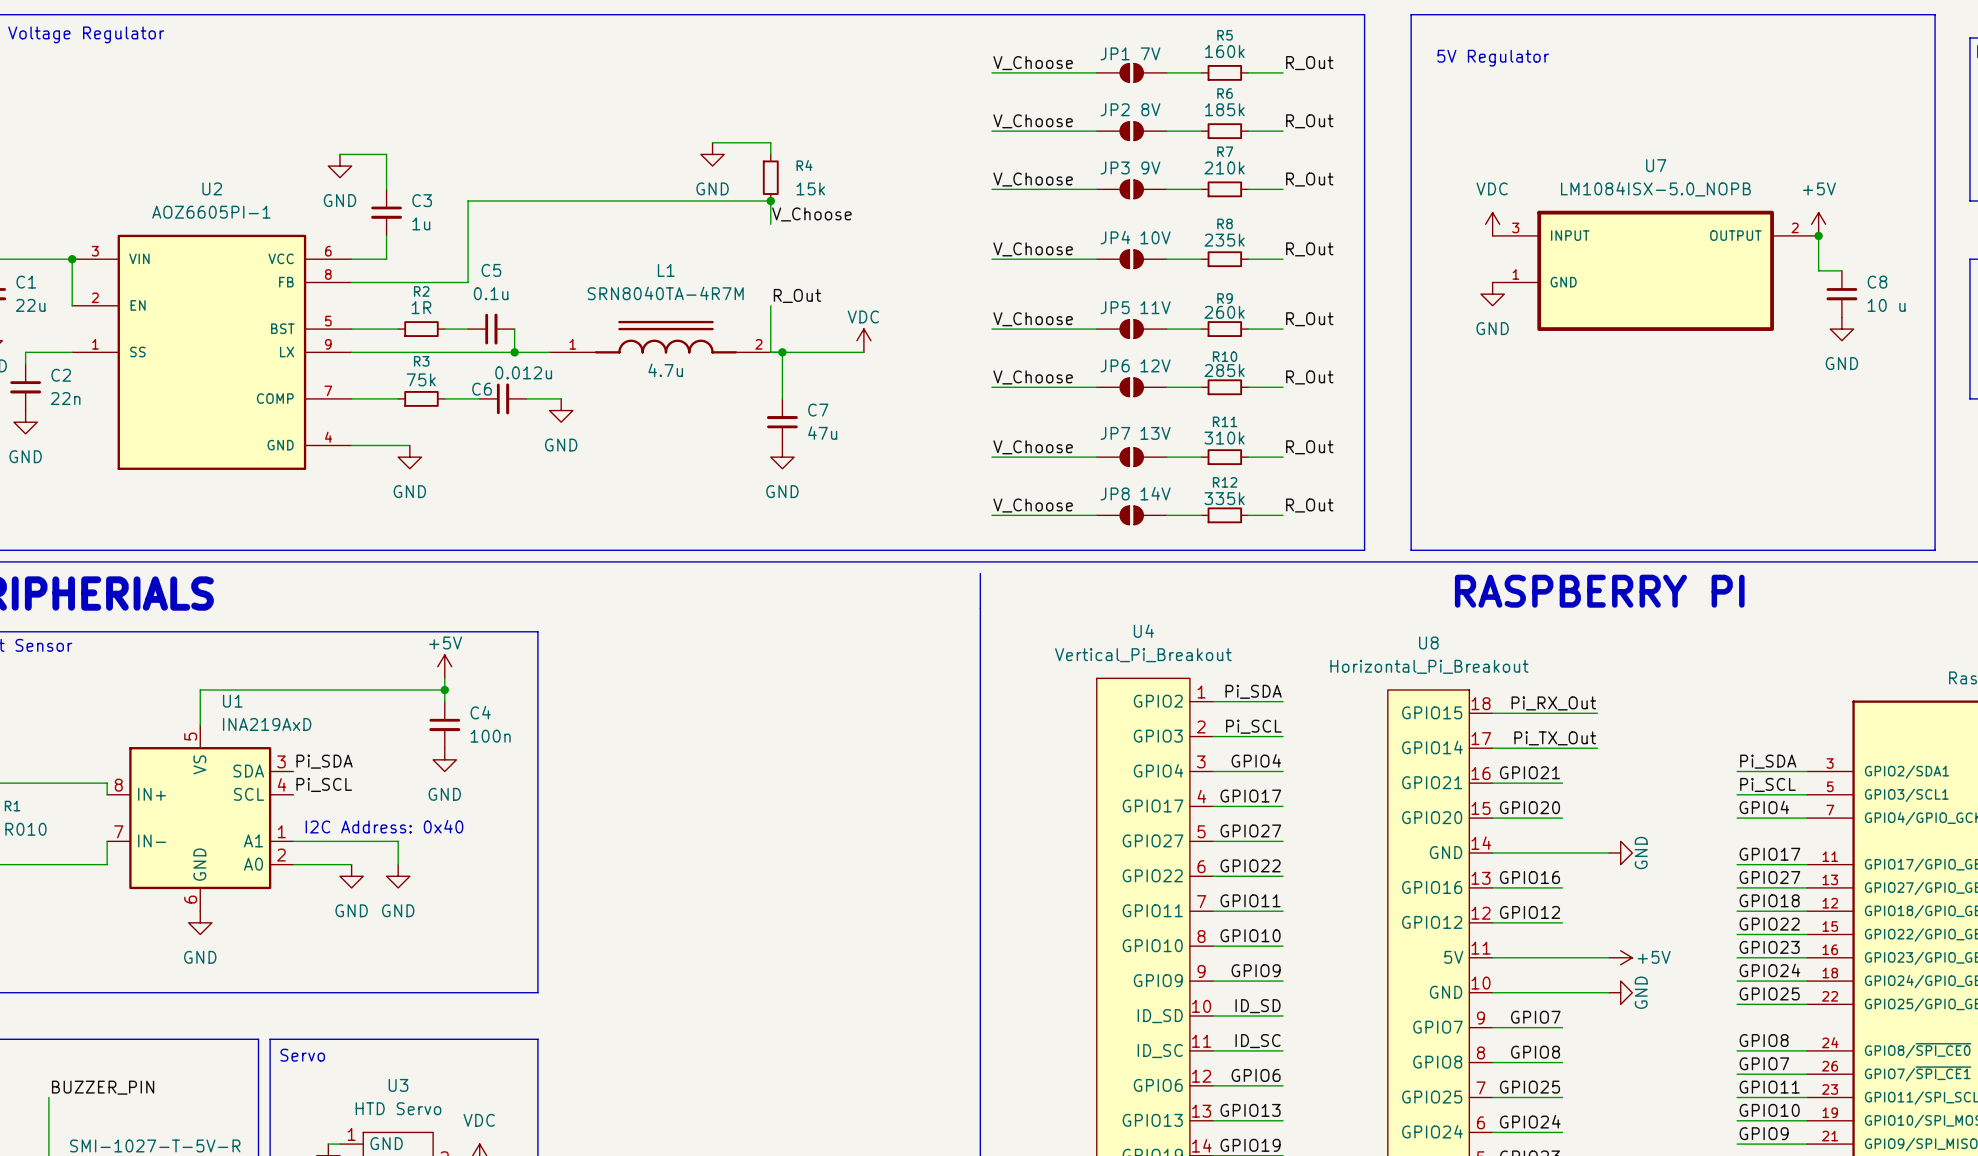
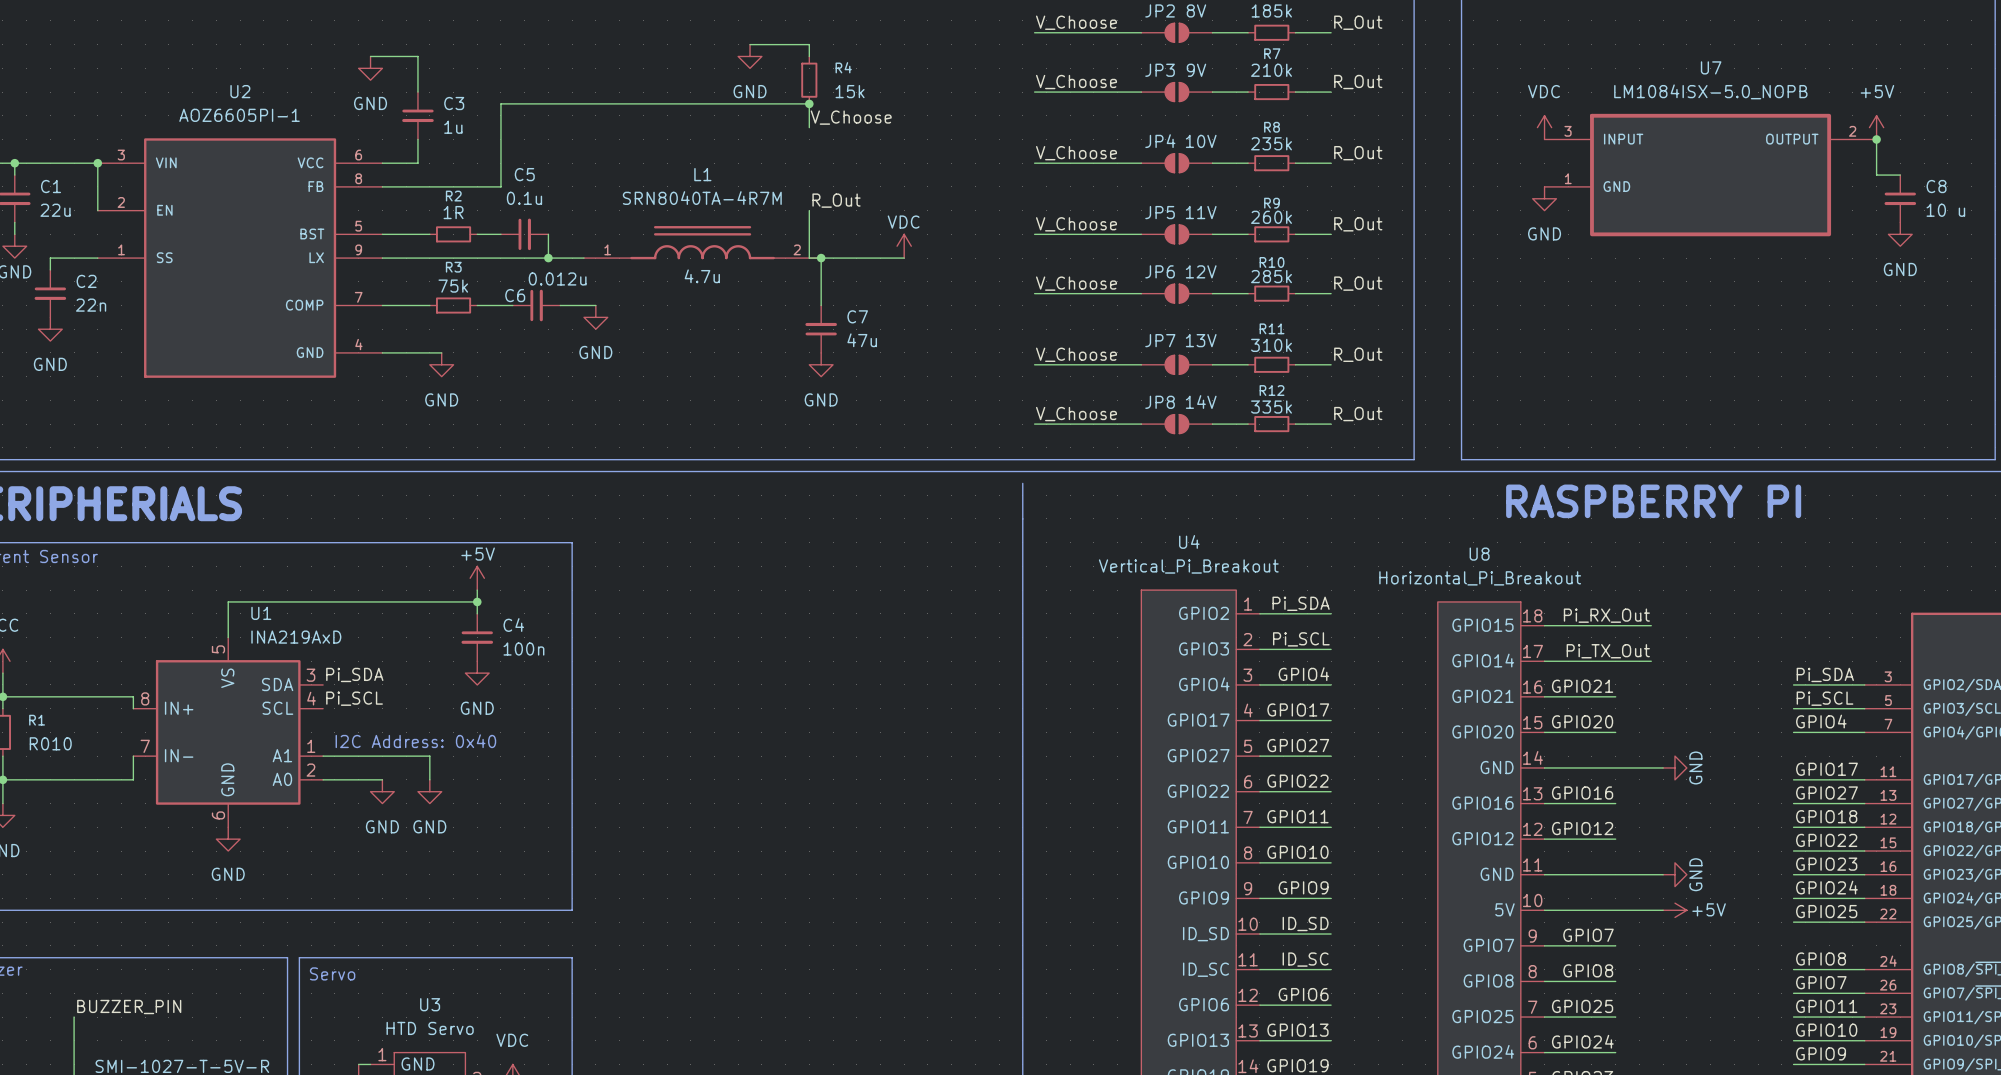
U8 pin name: 5V (1453, 957) -> GND (1497, 874)
power symbol: +5V (1620, 957) -> GND (1674, 874)
U8 pin name: GND (1446, 992) -> 5V (1504, 909)
power symbol: GND (1620, 992) -> +5V (1674, 910)

